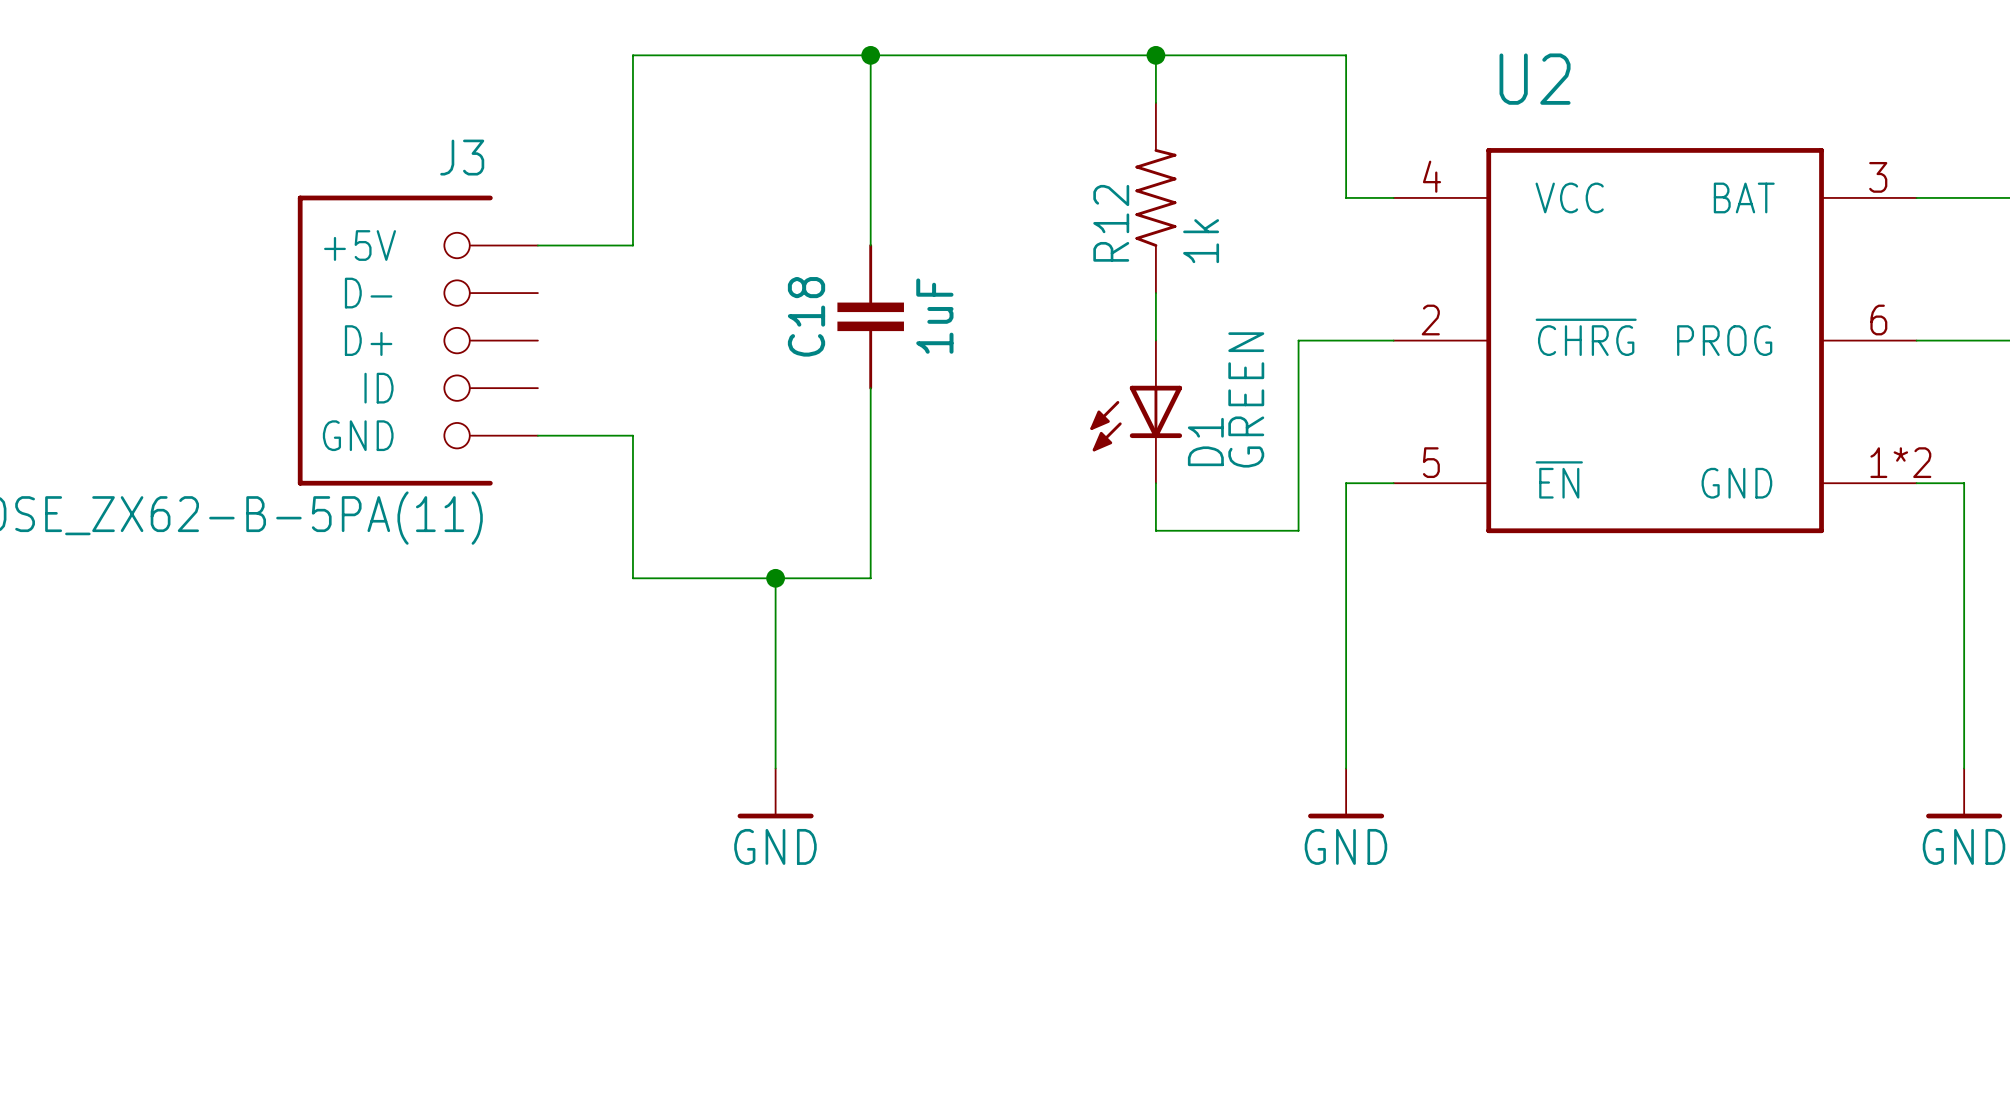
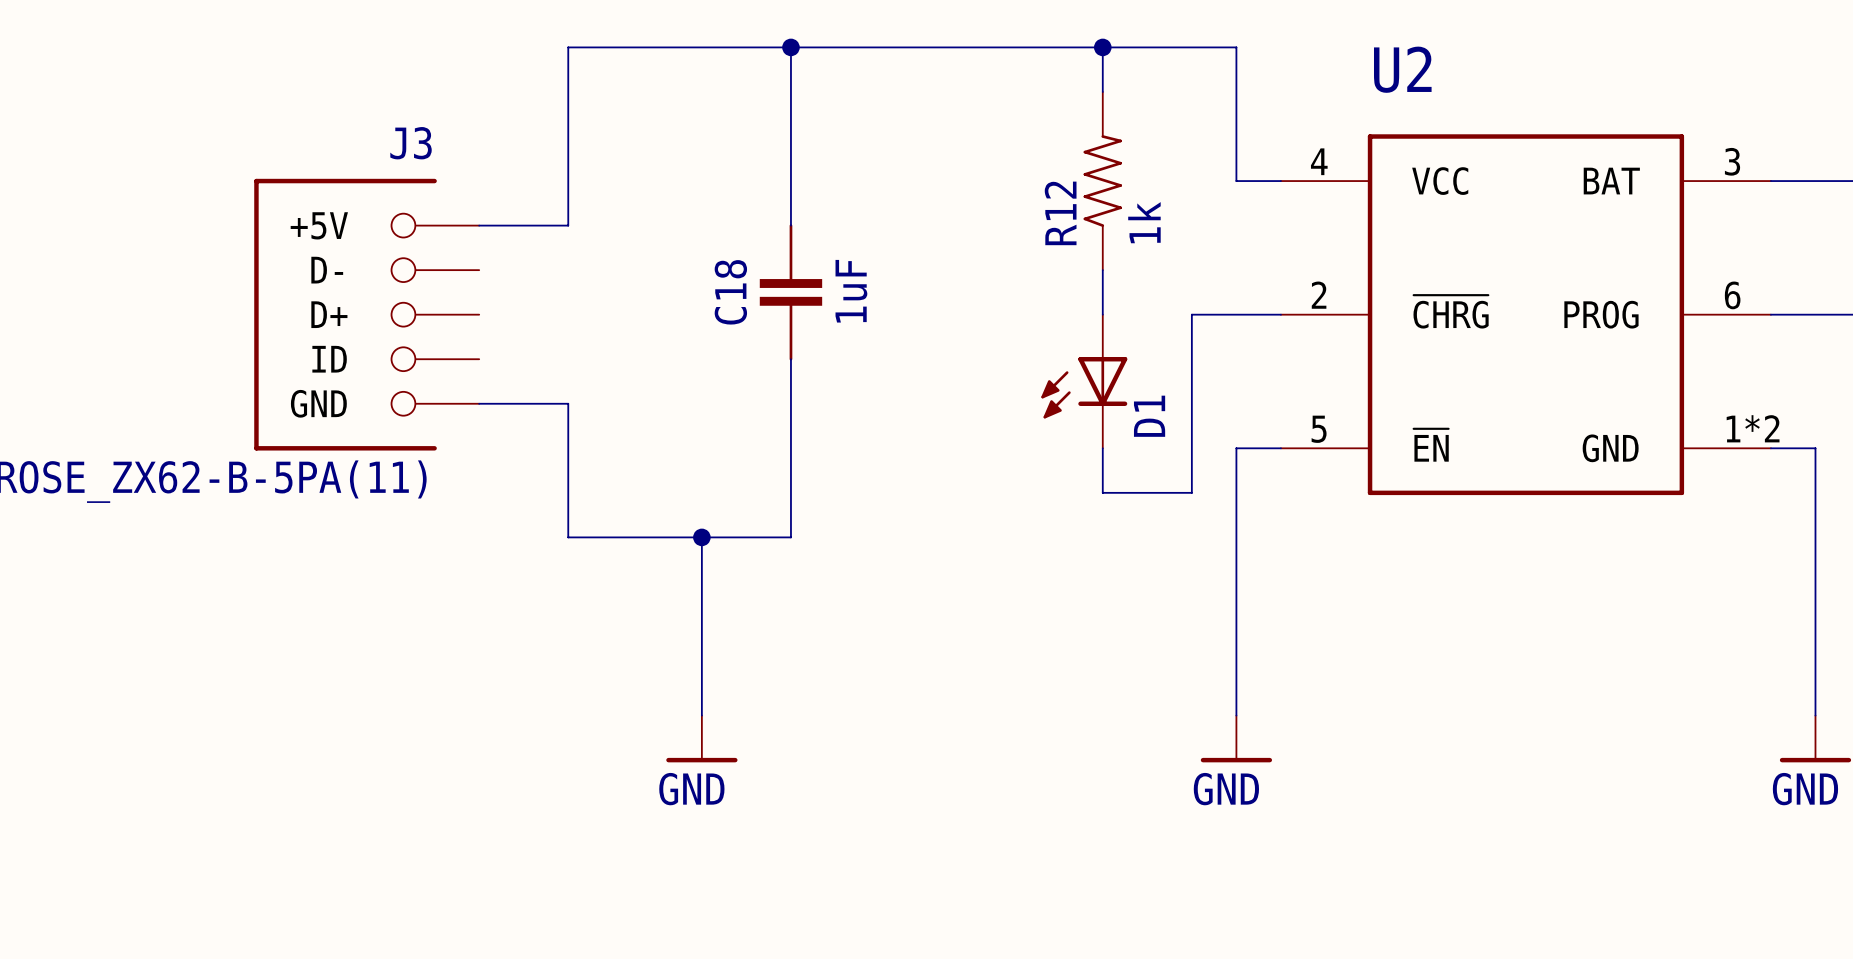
wire: (1155, 55) (1155, 102) -> (1102, 47) (1102, 91)
junction position: (1155, 55) -> (1102, 47)
R12 position: (1155, 197) -> (1102, 181)
wire: (1155, 293) (1155, 340) -> (1102, 270) (1102, 314)
D1 value: GREEN (1246, 399) -> none
D1 position: (1136, 411) -> (1084, 381)
wire: (1155, 483) (1155, 530) (1203, 530) -> (1102, 448) (1102, 492)

